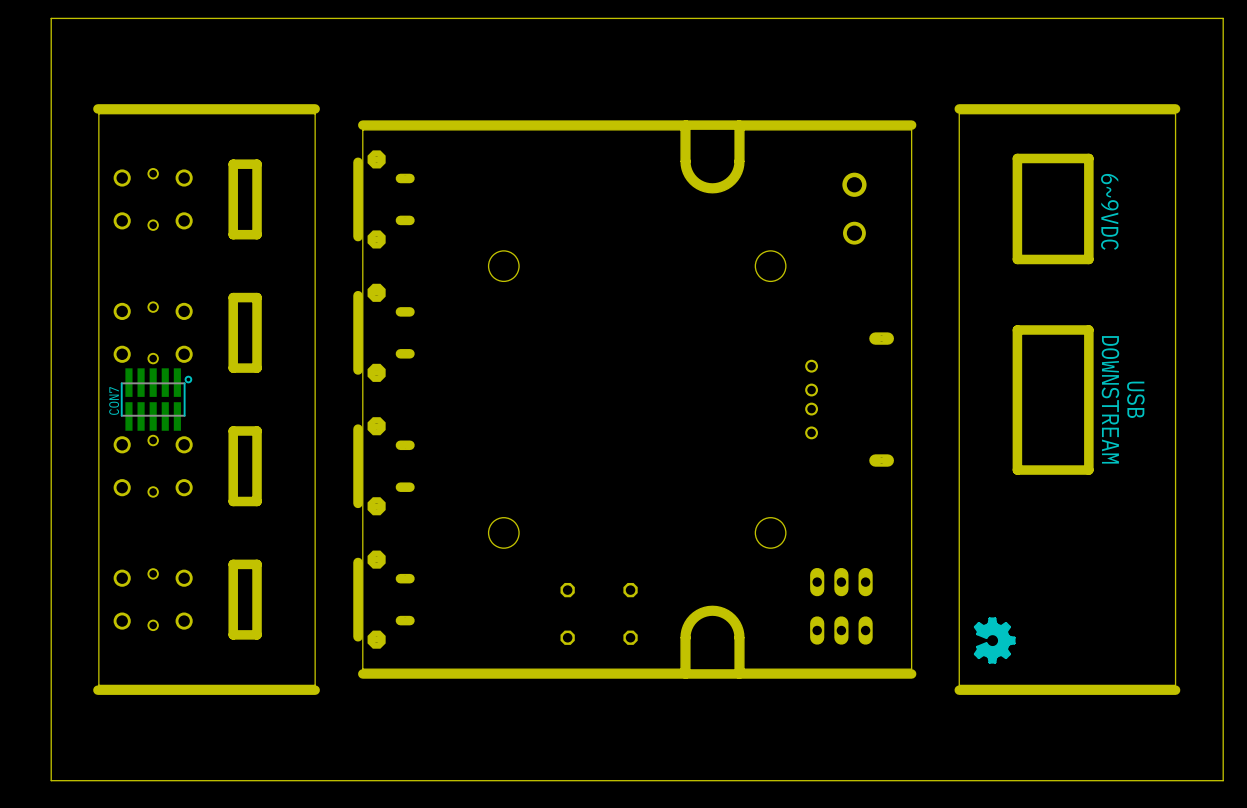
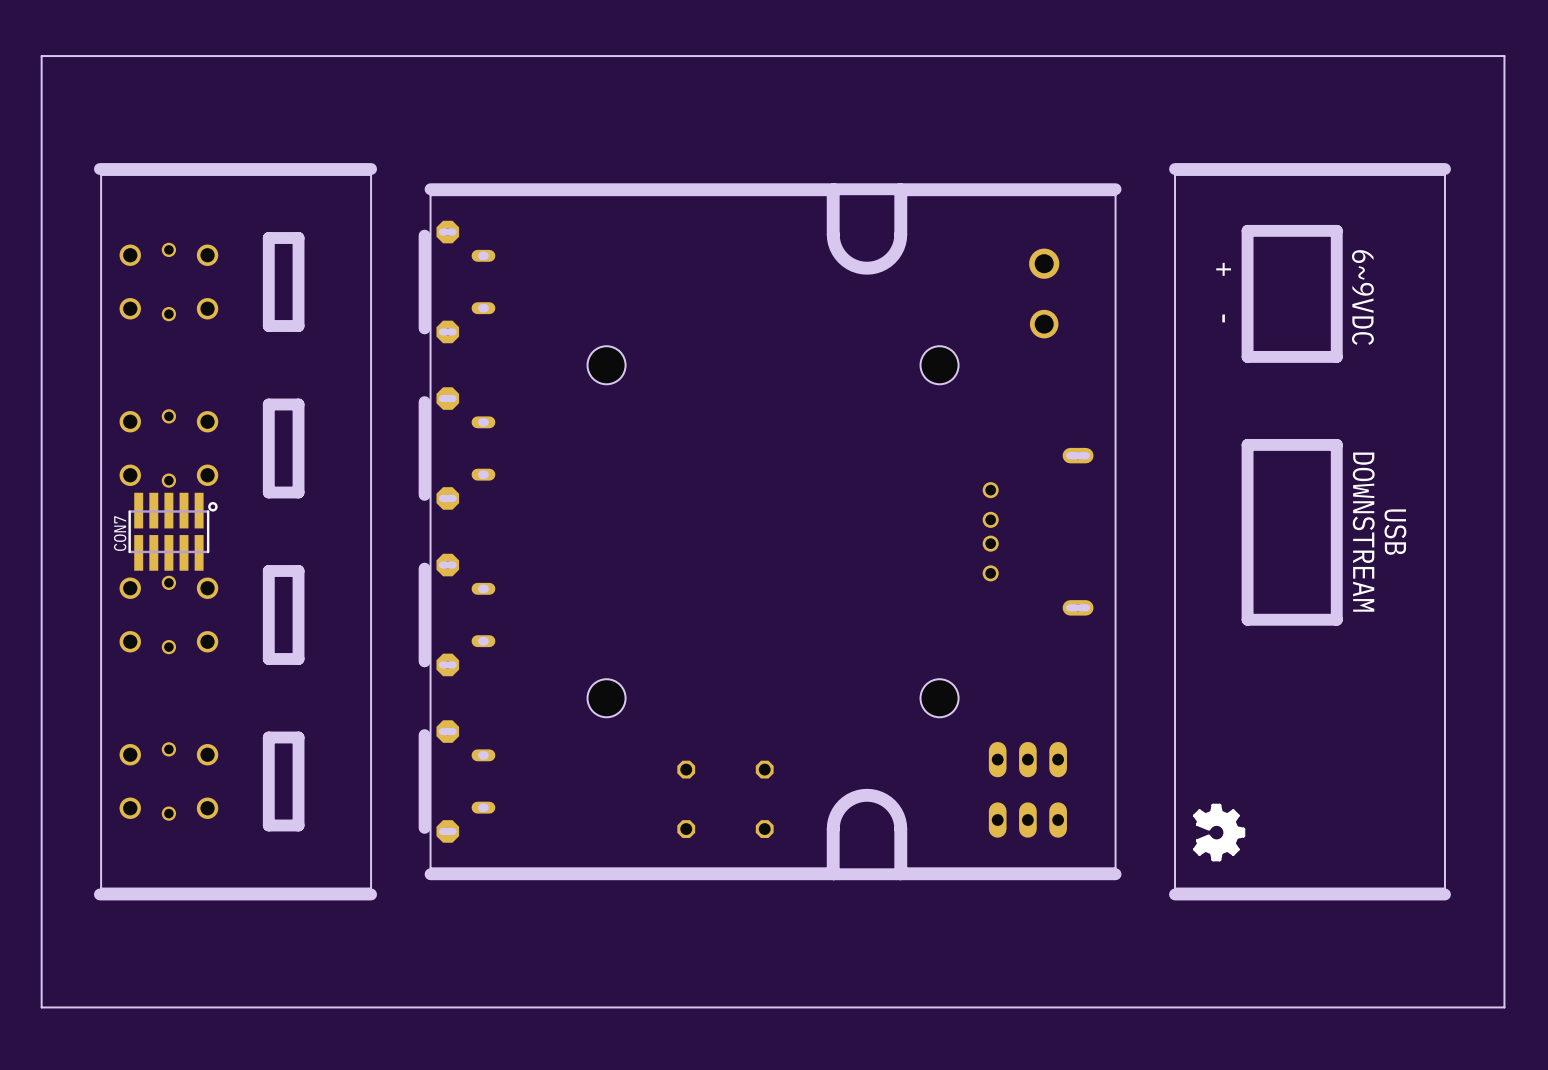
text: none -> + - (1223, 292)

